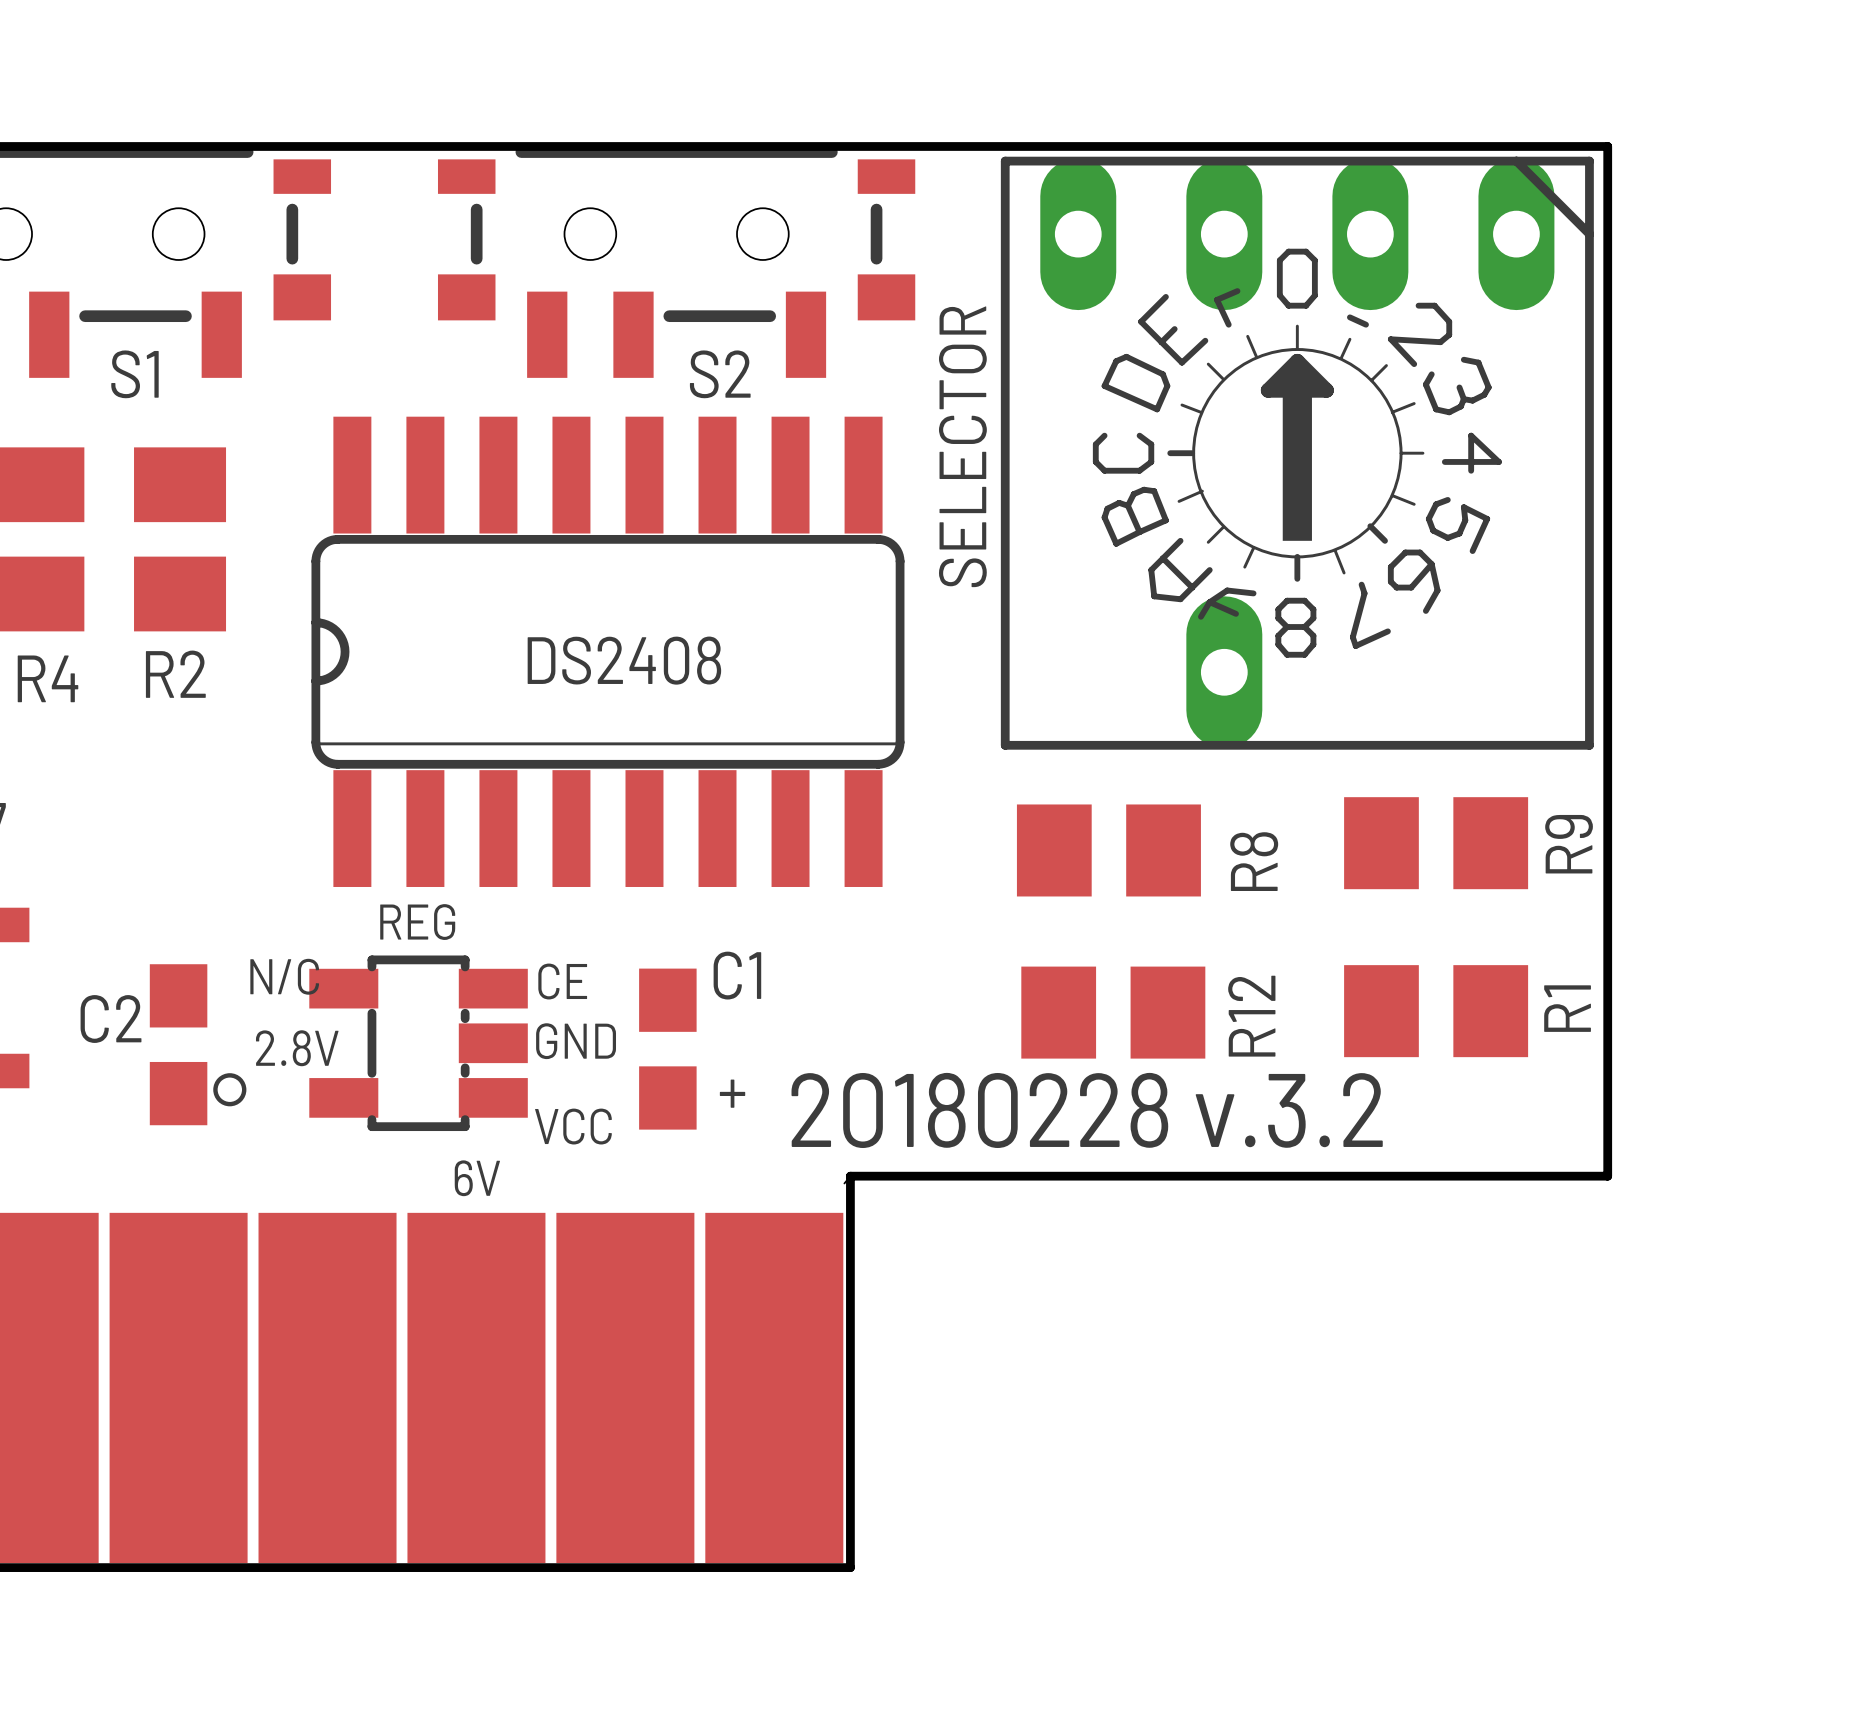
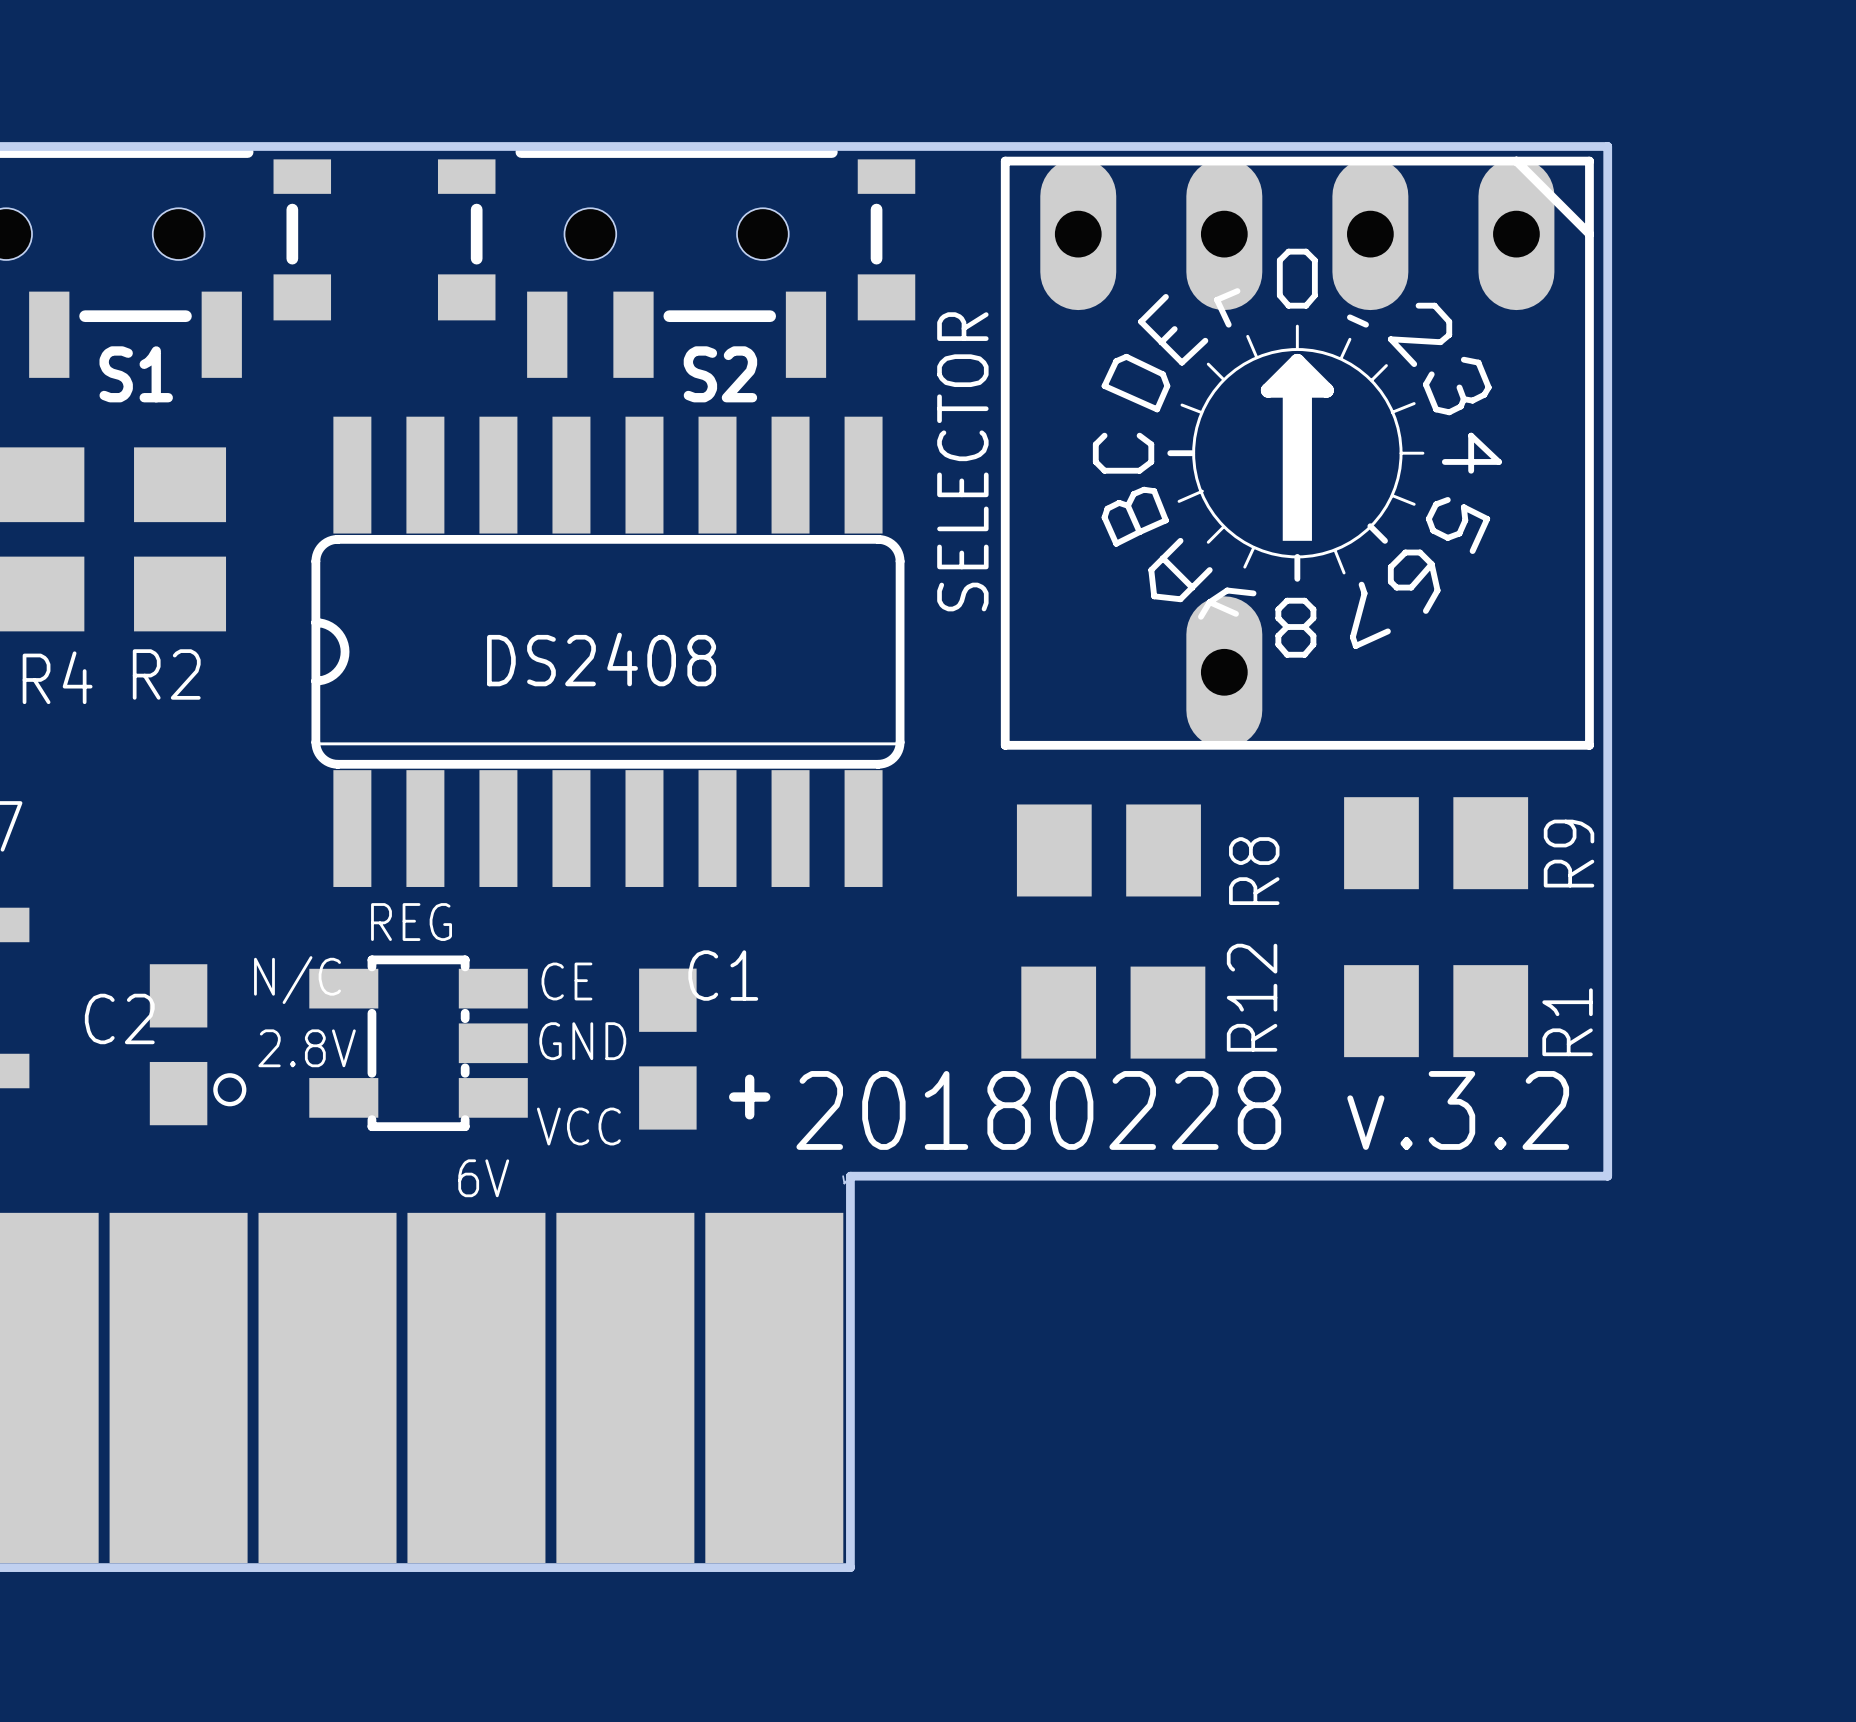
board edge: none -> (843, 1176) (844, 1183)

